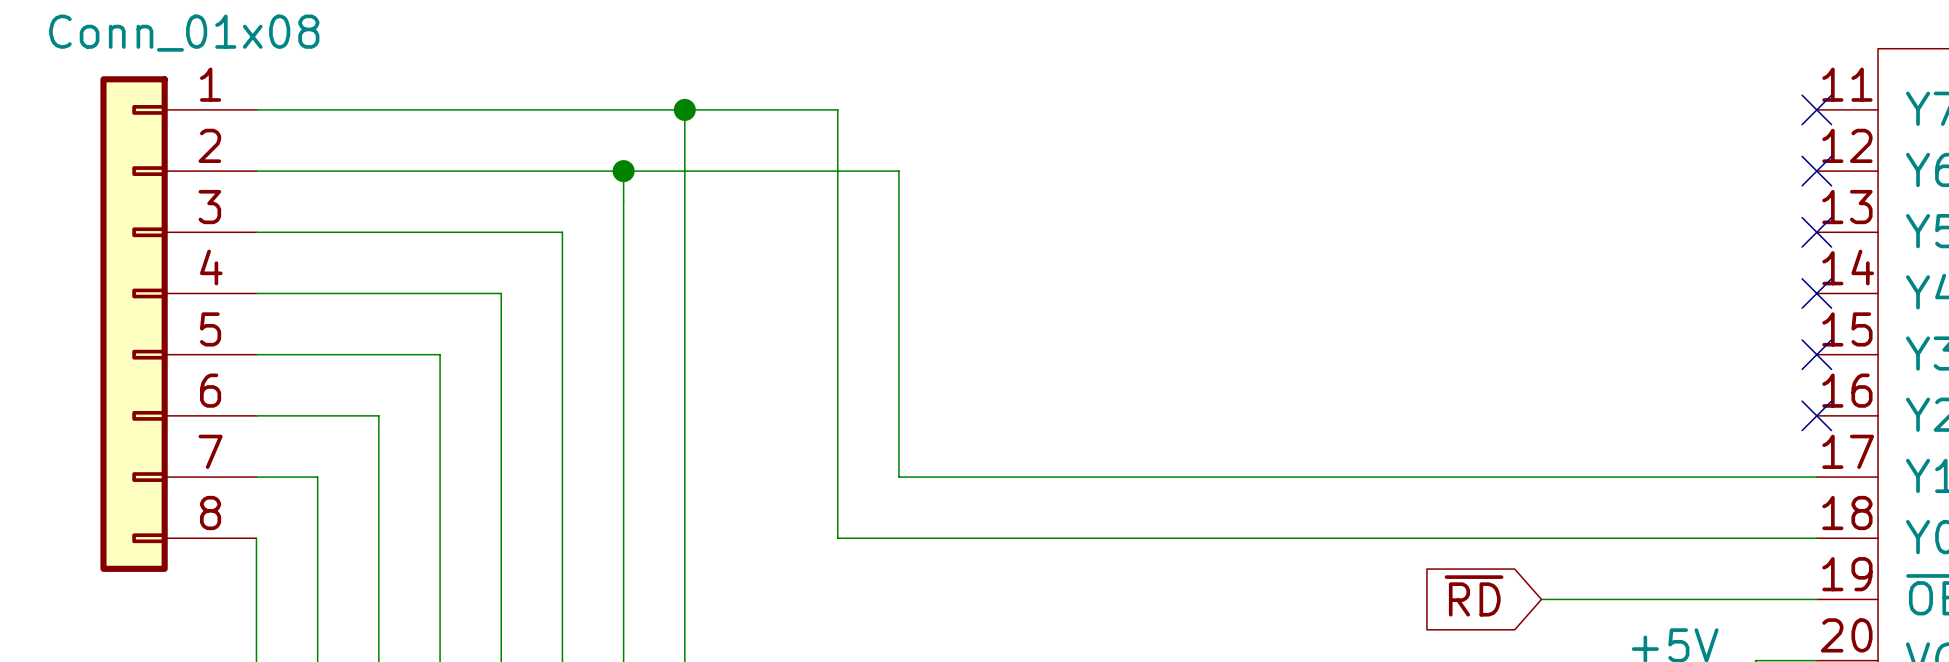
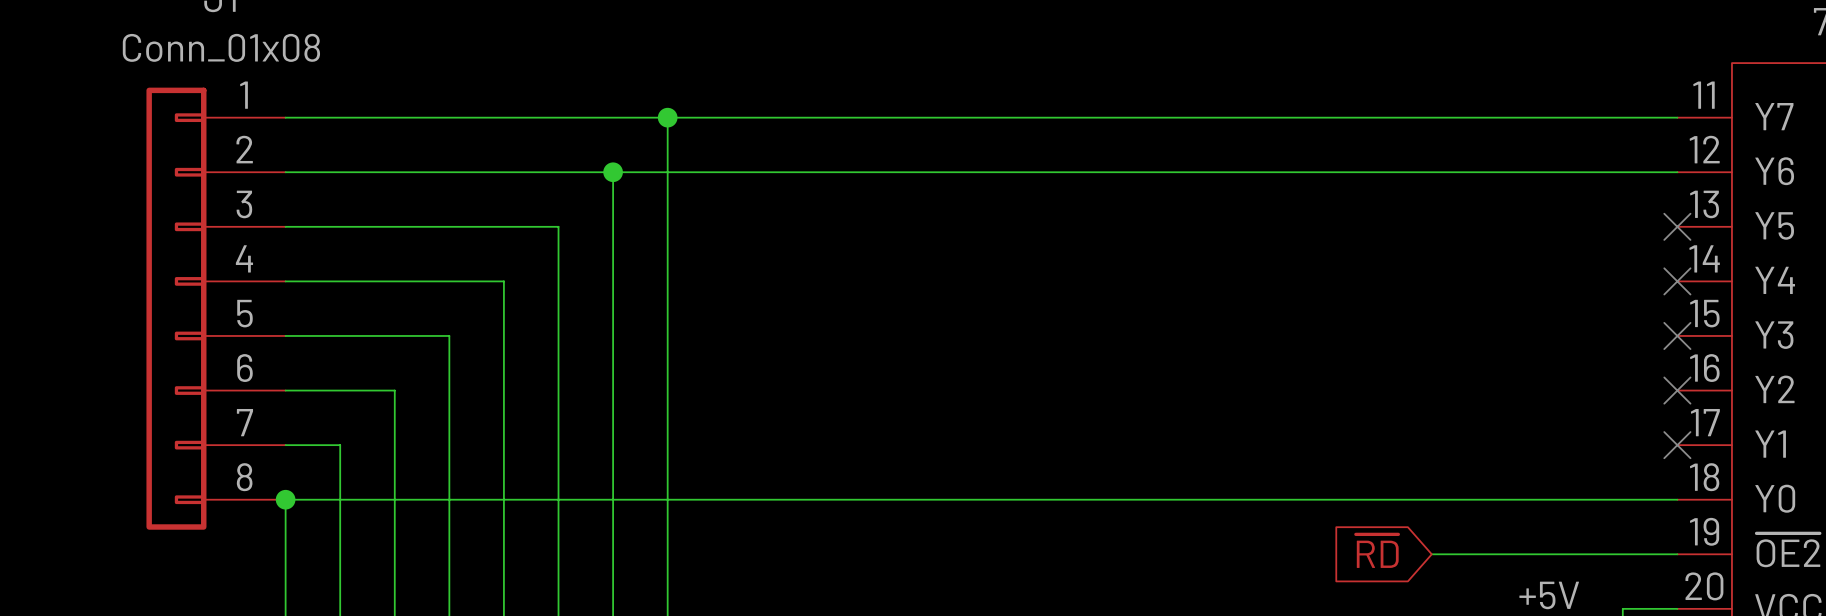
wire: (837, 109) (837, 538) -> (285, 499) (804, 499)
wire: none -> (804, 117) (1677, 117)
no-connect mark: (1816, 109) -> none
wire: (898, 171) (898, 477) (1816, 477) -> (858, 172) (1677, 172)
no-connect mark: (1816, 171) -> none
no-connect mark: none -> (1677, 445)
junction: none -> (285, 499)

